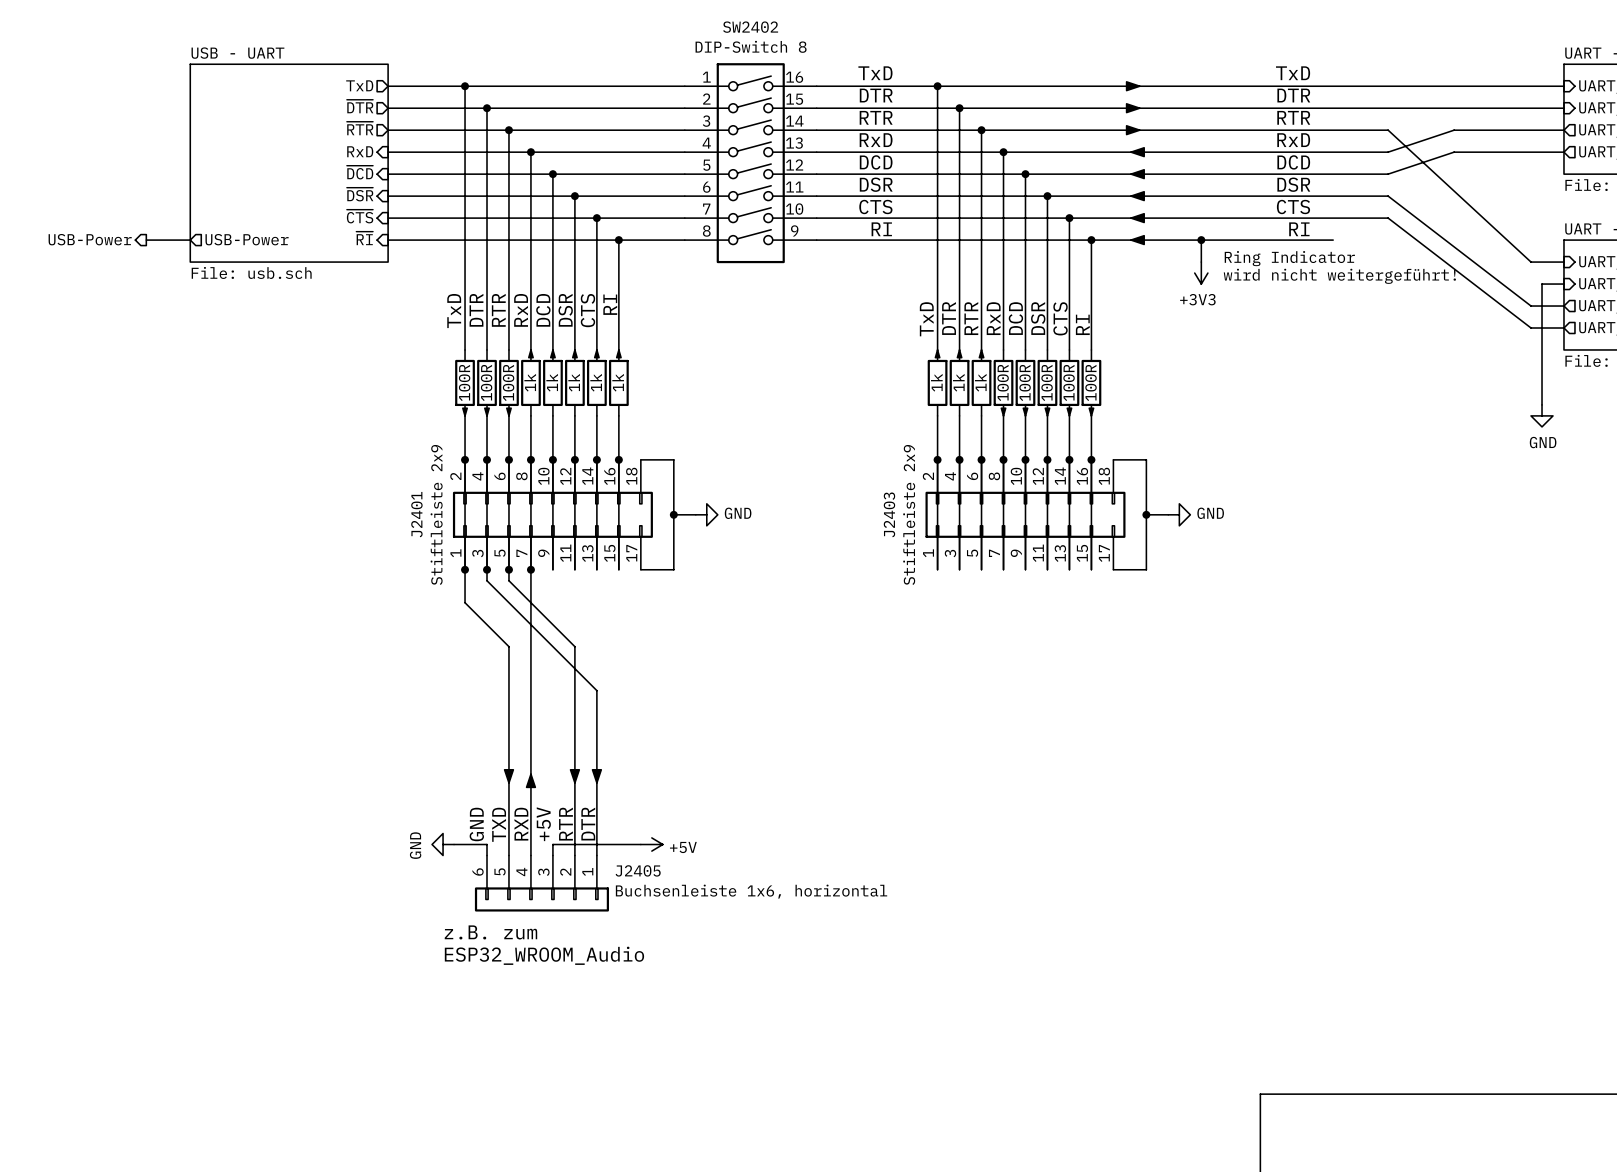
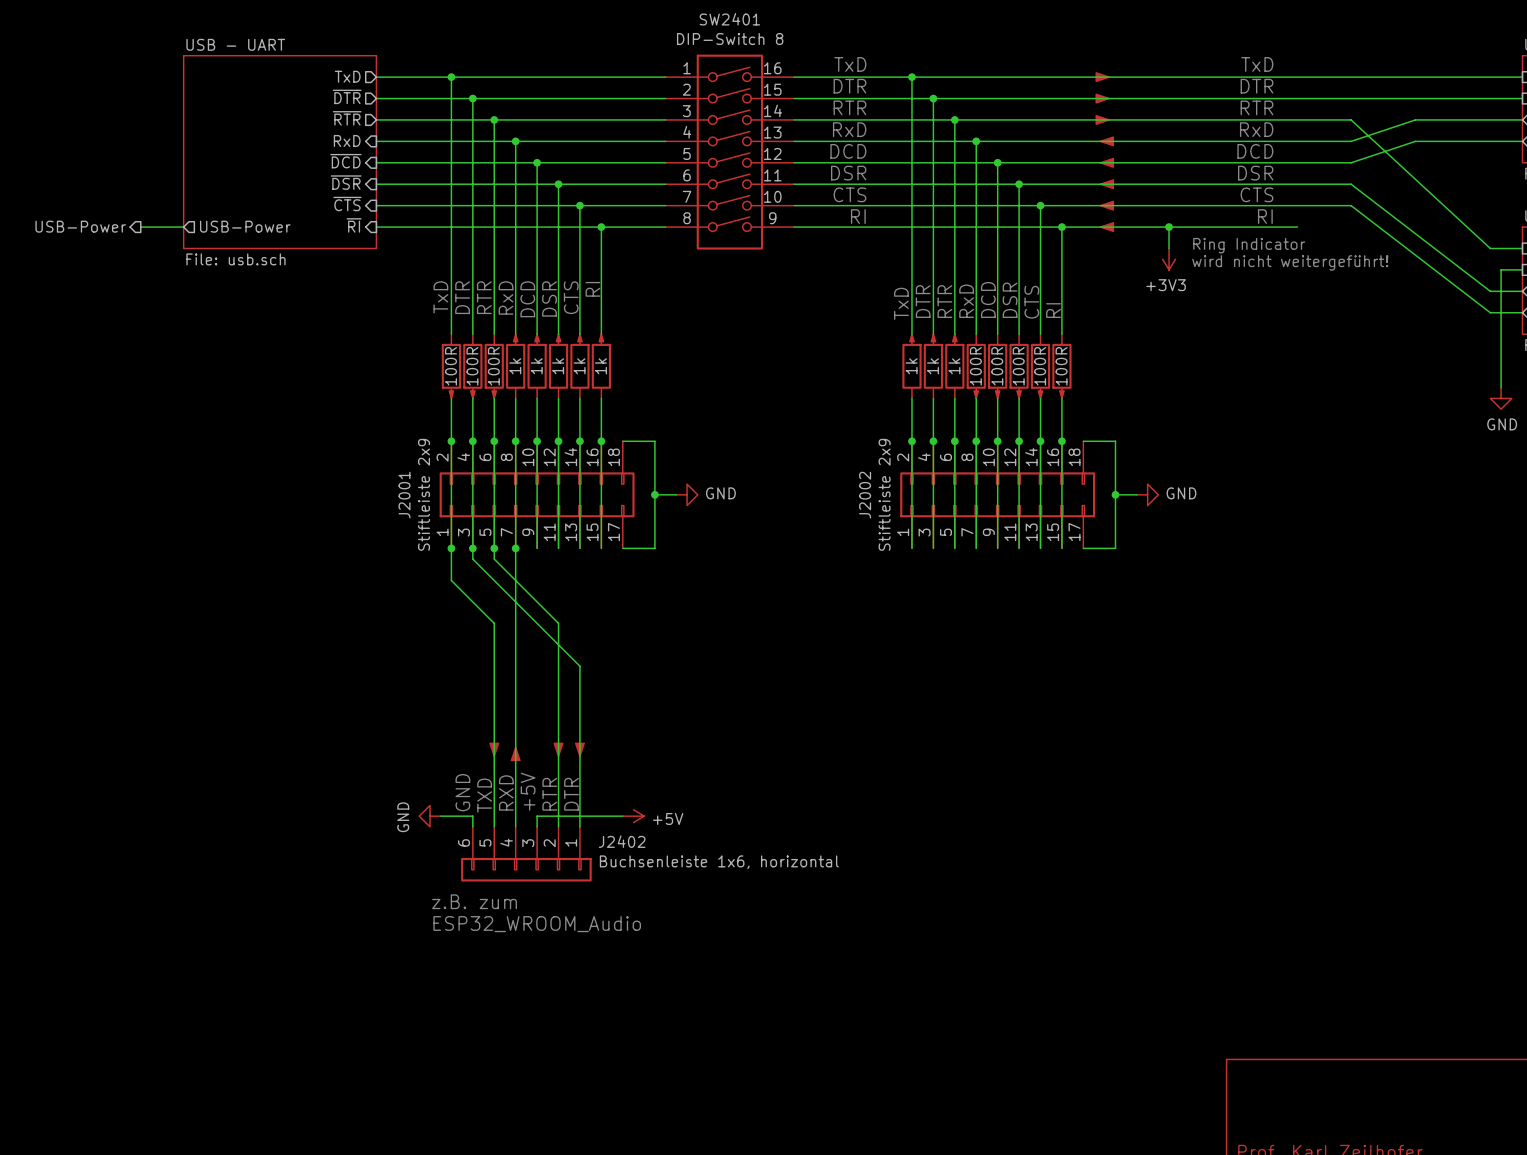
SW2402 name: SW2402 (750, 27) -> SW2401 (729, 19)
J2401 name: J2401 (416, 514) -> J2001 (404, 495)
J2403 name: J2403 (889, 514) -> J2002 (865, 495)
J2405 name: J2405 (638, 870) -> J2402 (622, 841)

